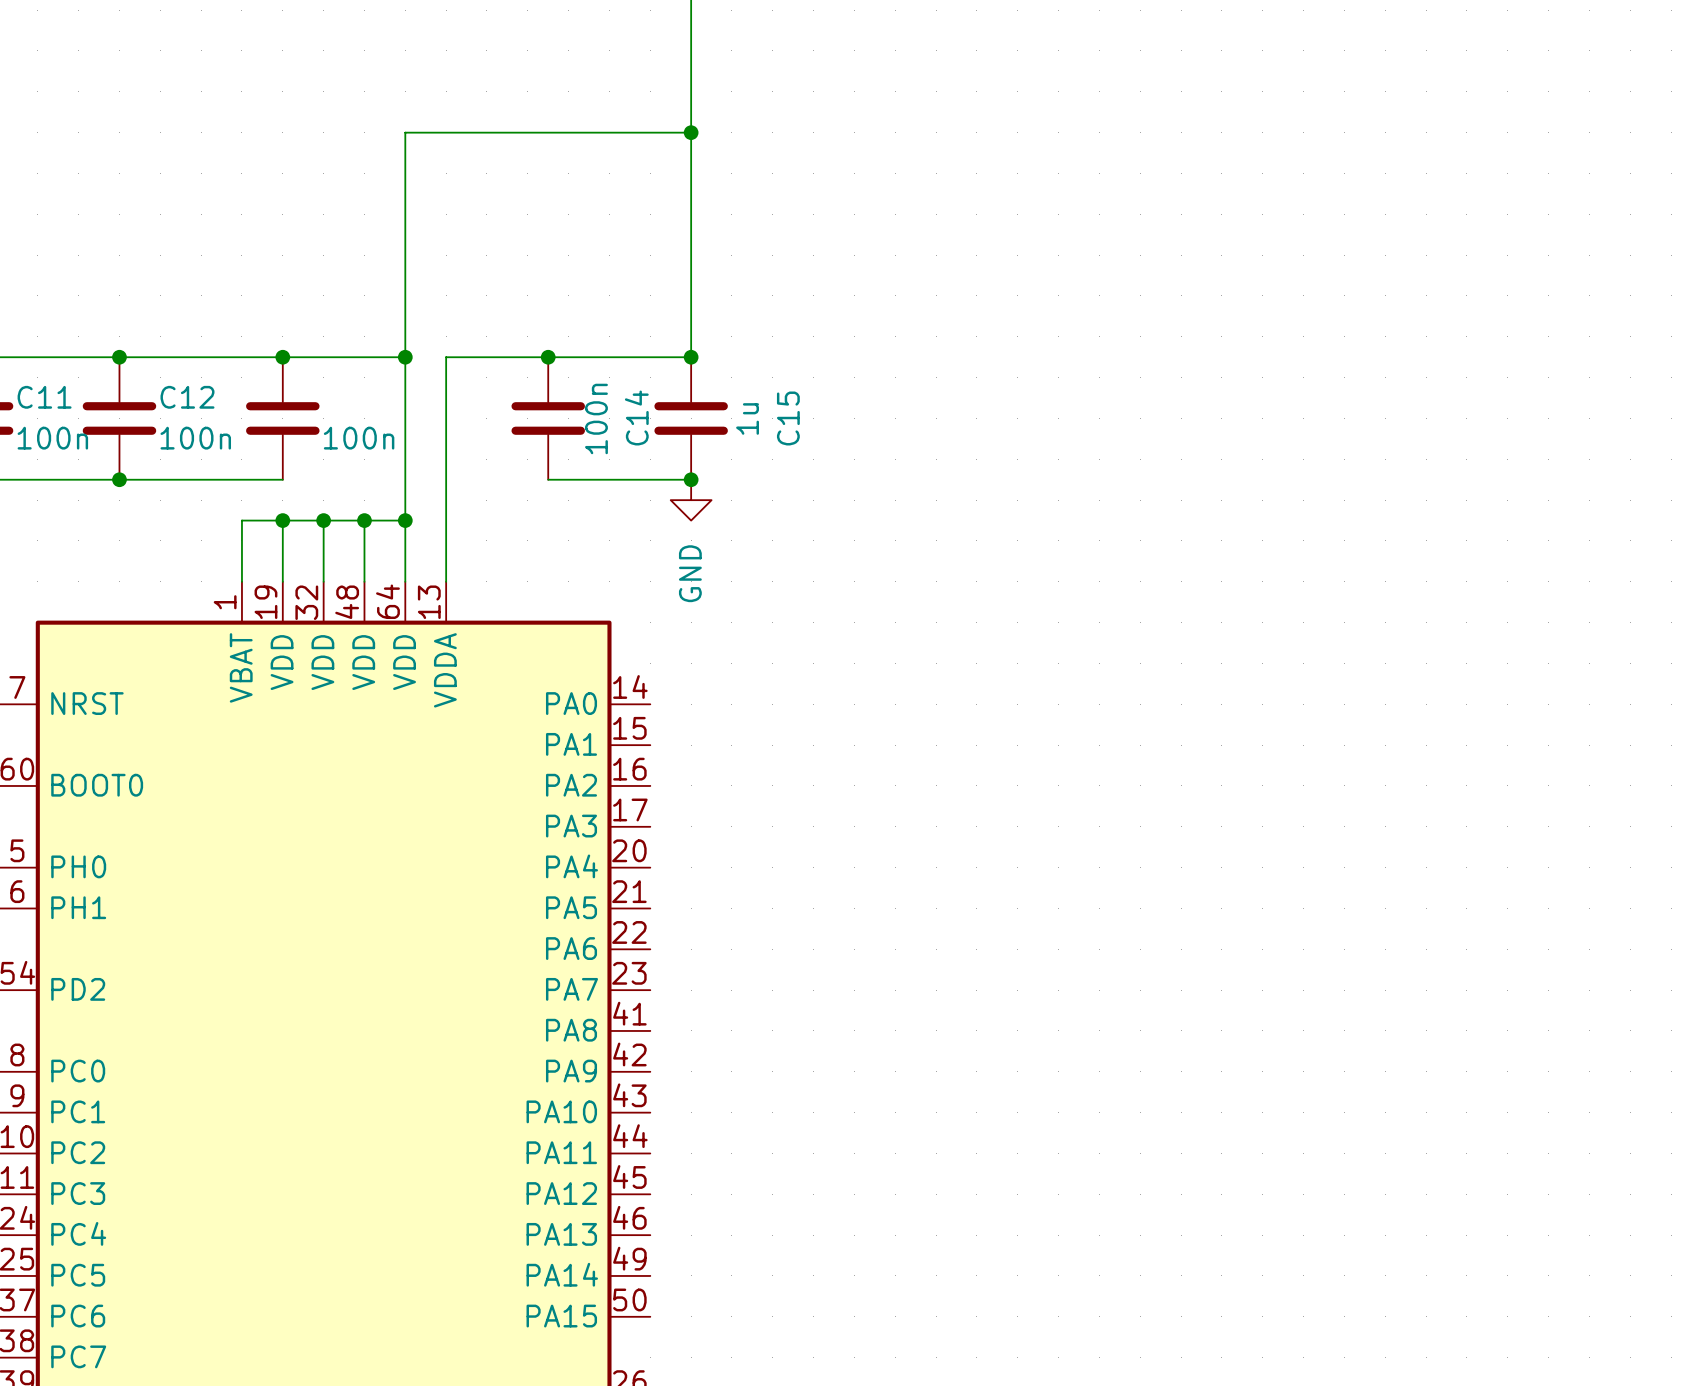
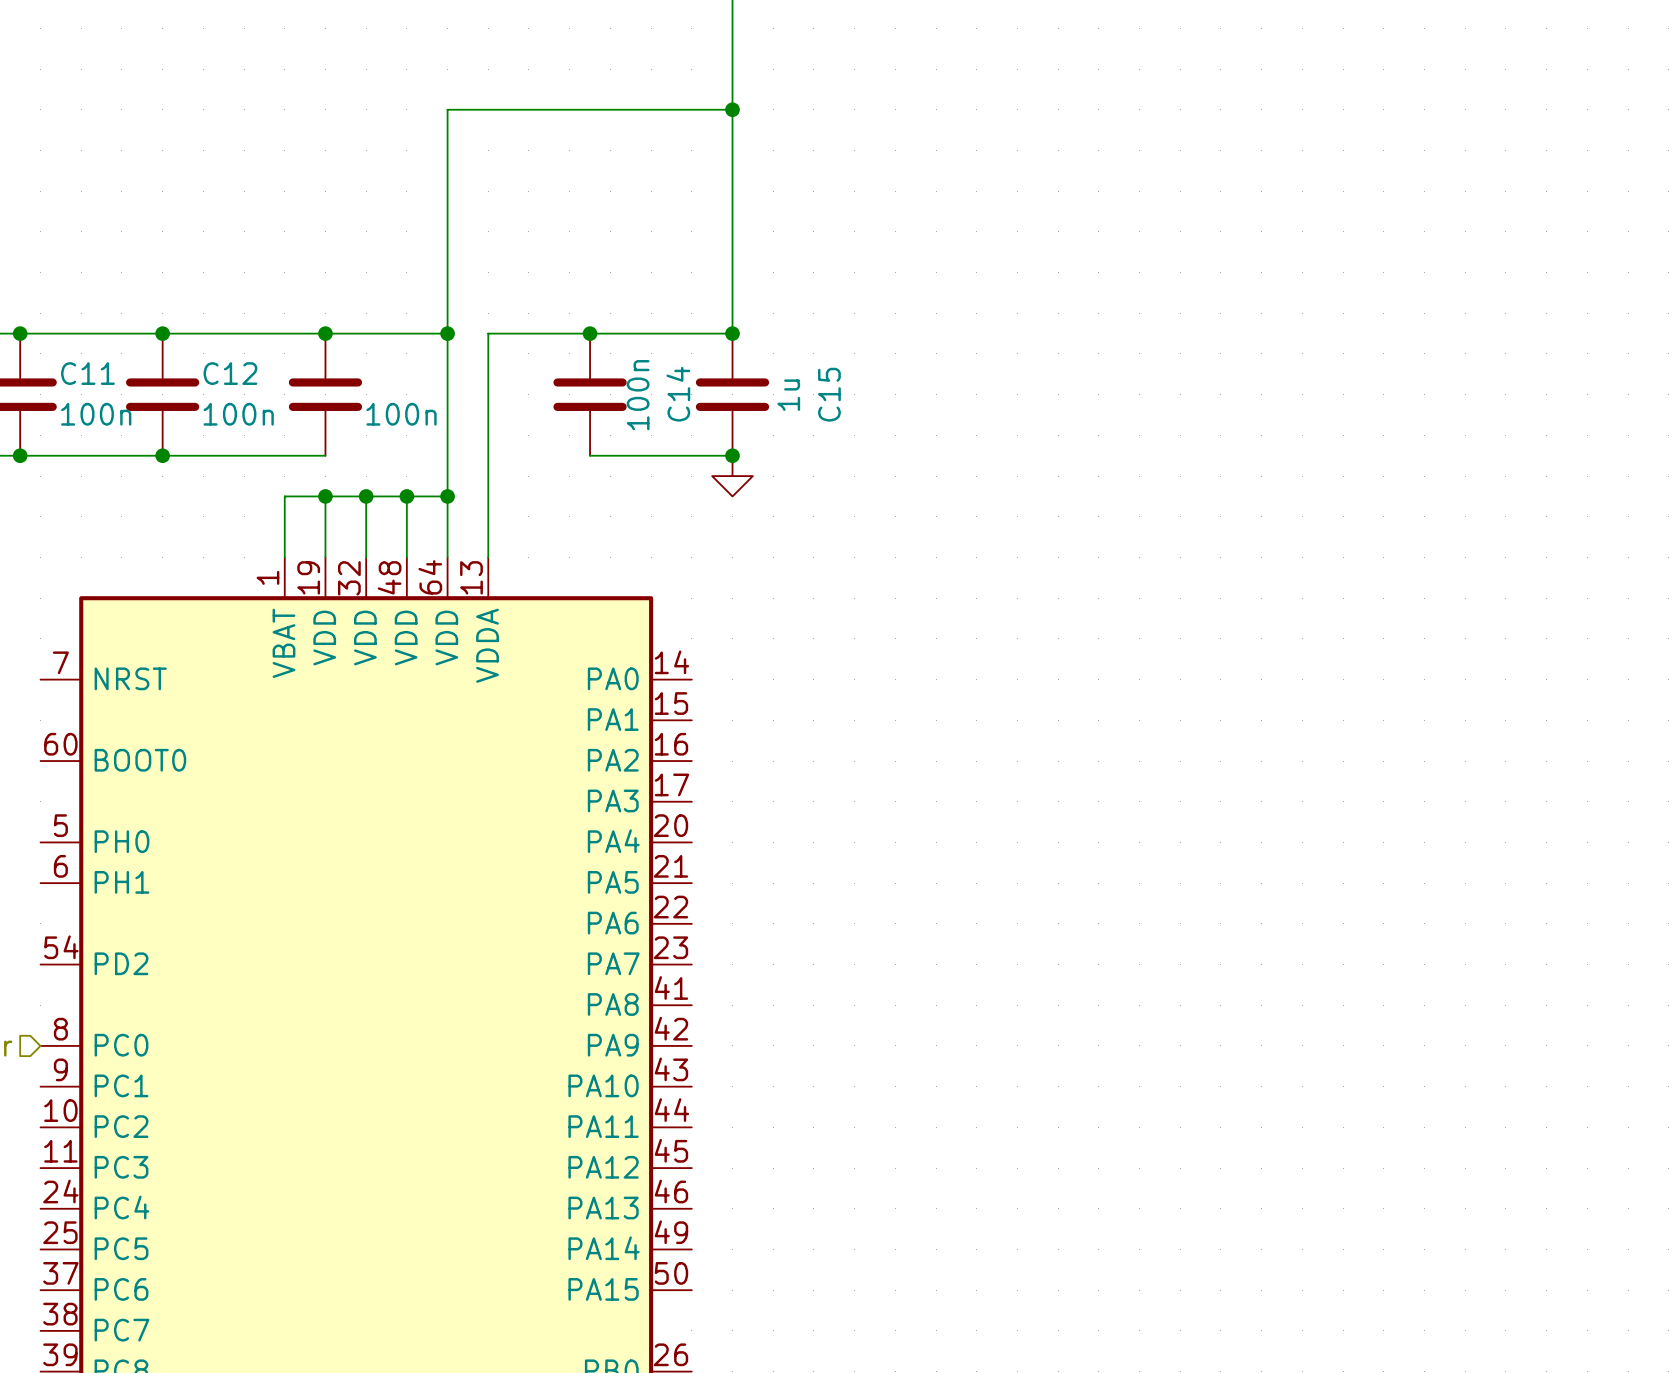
power symbol text: GND (690, 573) -> none

